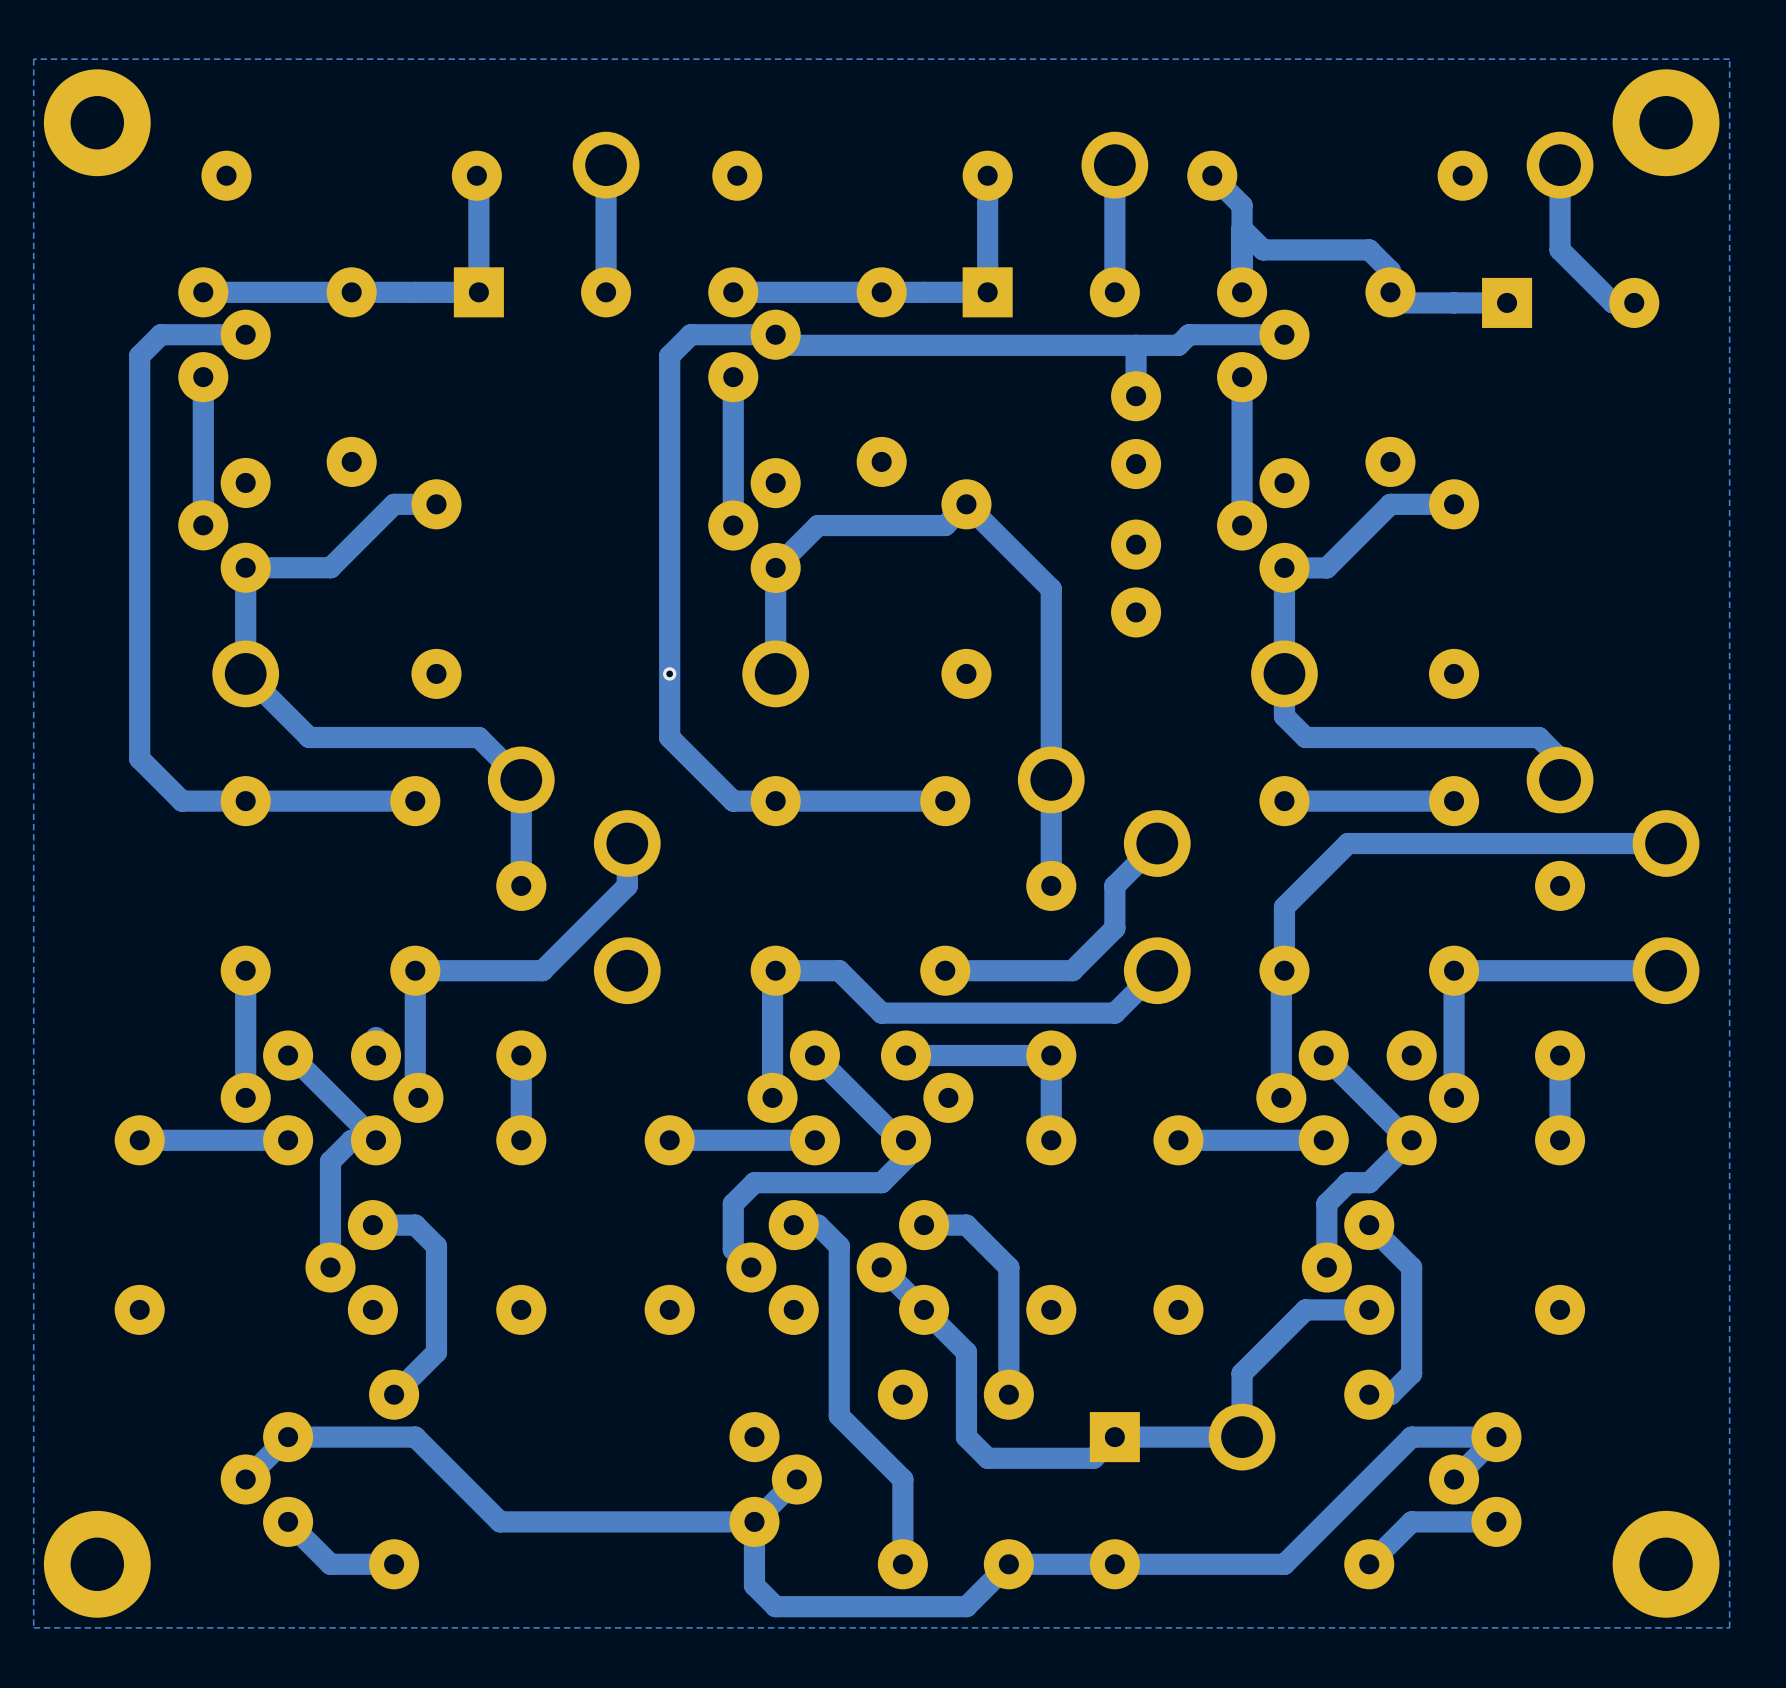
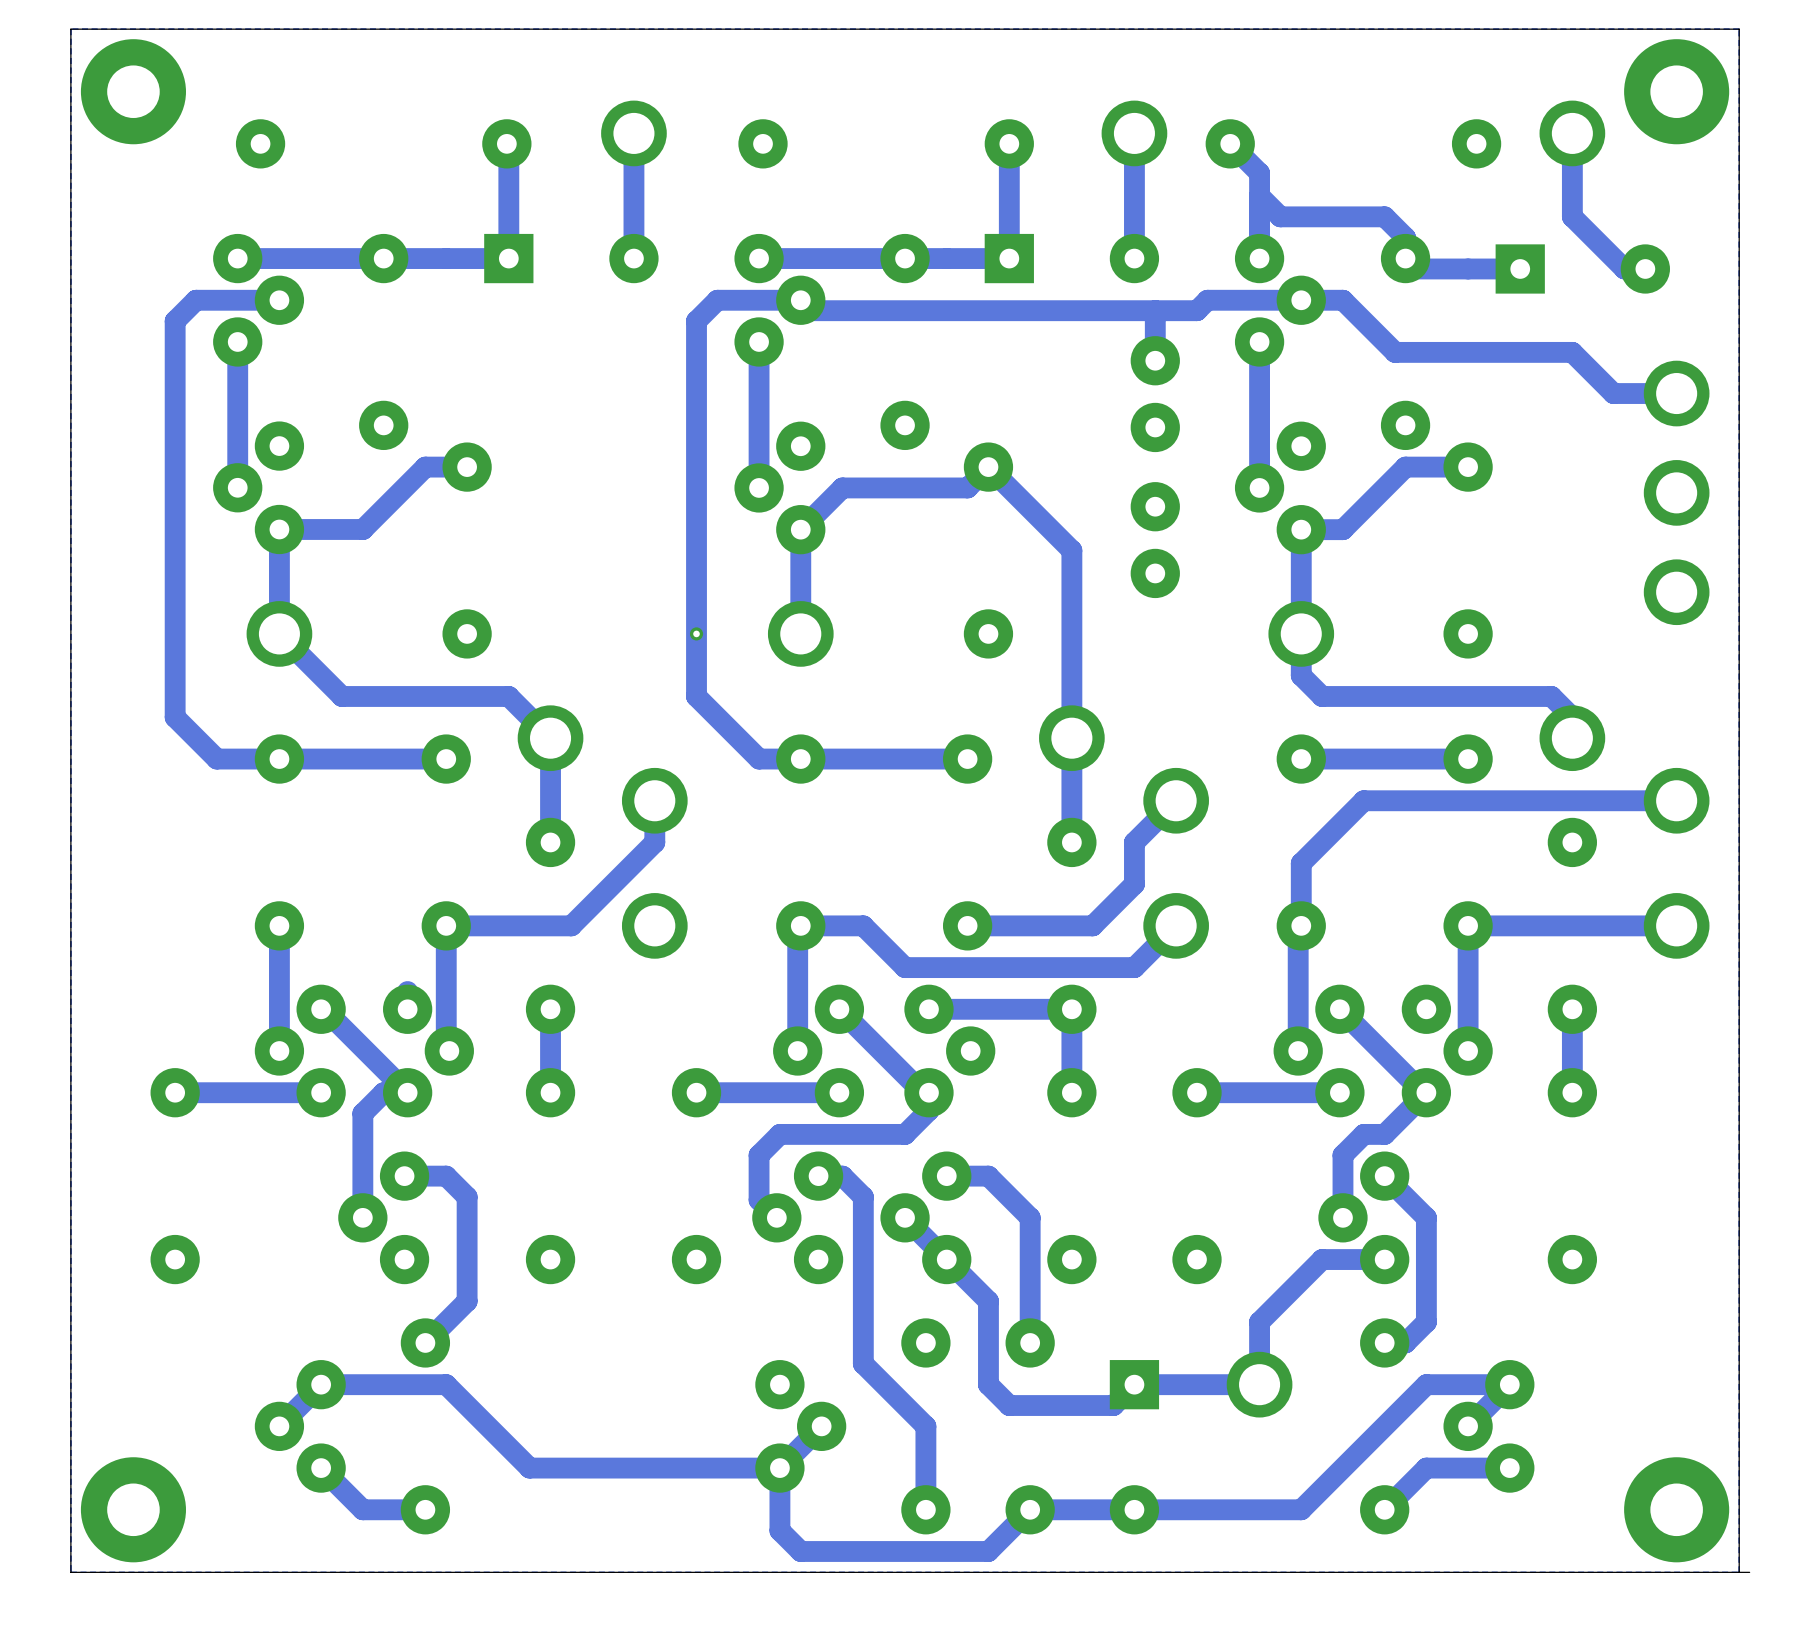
track: none -> (1301, 300) (1342, 300) (1395, 352) (1572, 352) (1613, 393) (1676, 393)
part: none -> (1676, 393)
part: none -> (1676, 492)
part: none -> (1676, 592)
board edge: none -> (1749, 1572) (70, 1572) (70, 29) (1739, 29) (1739, 1572)

